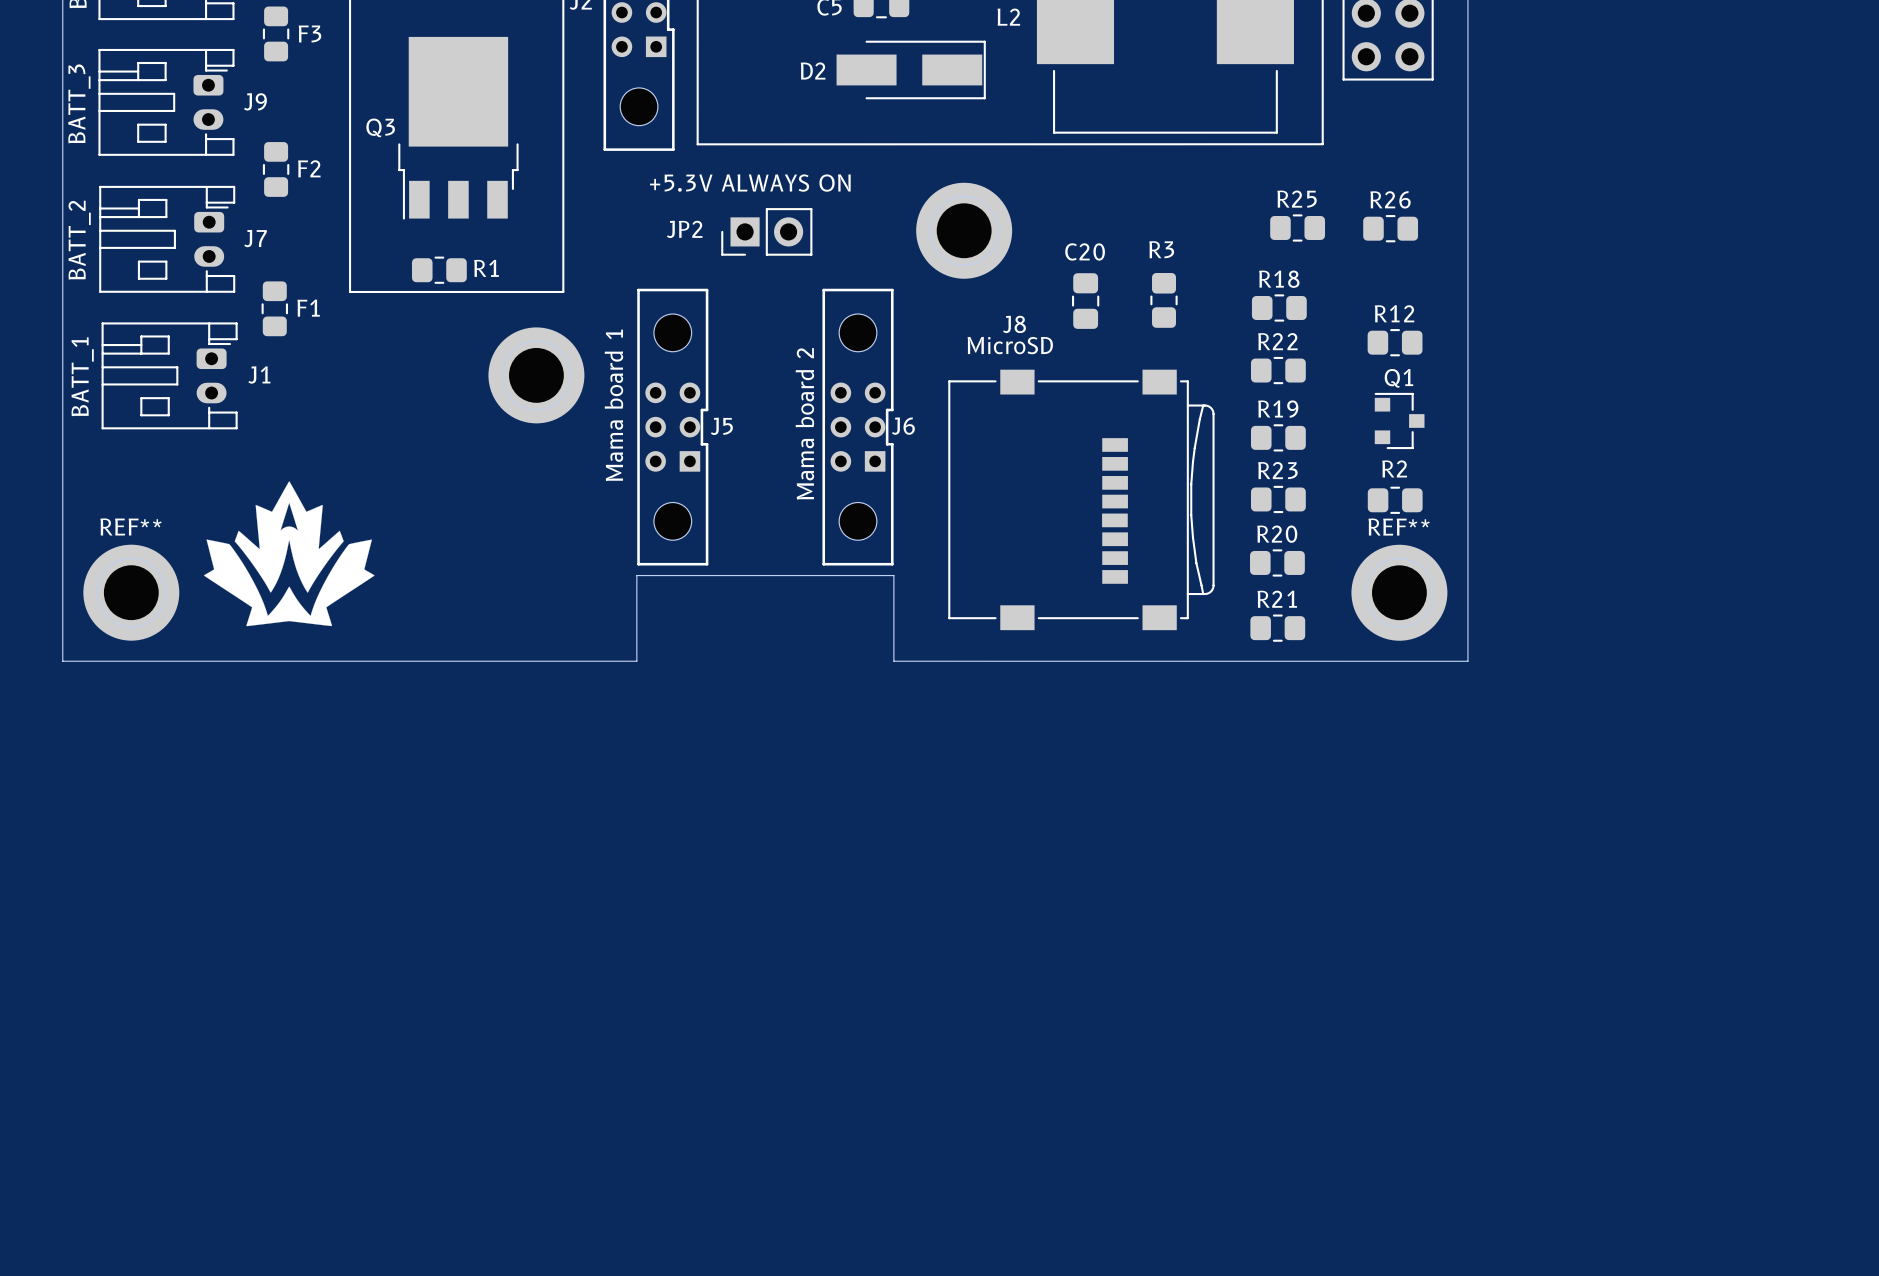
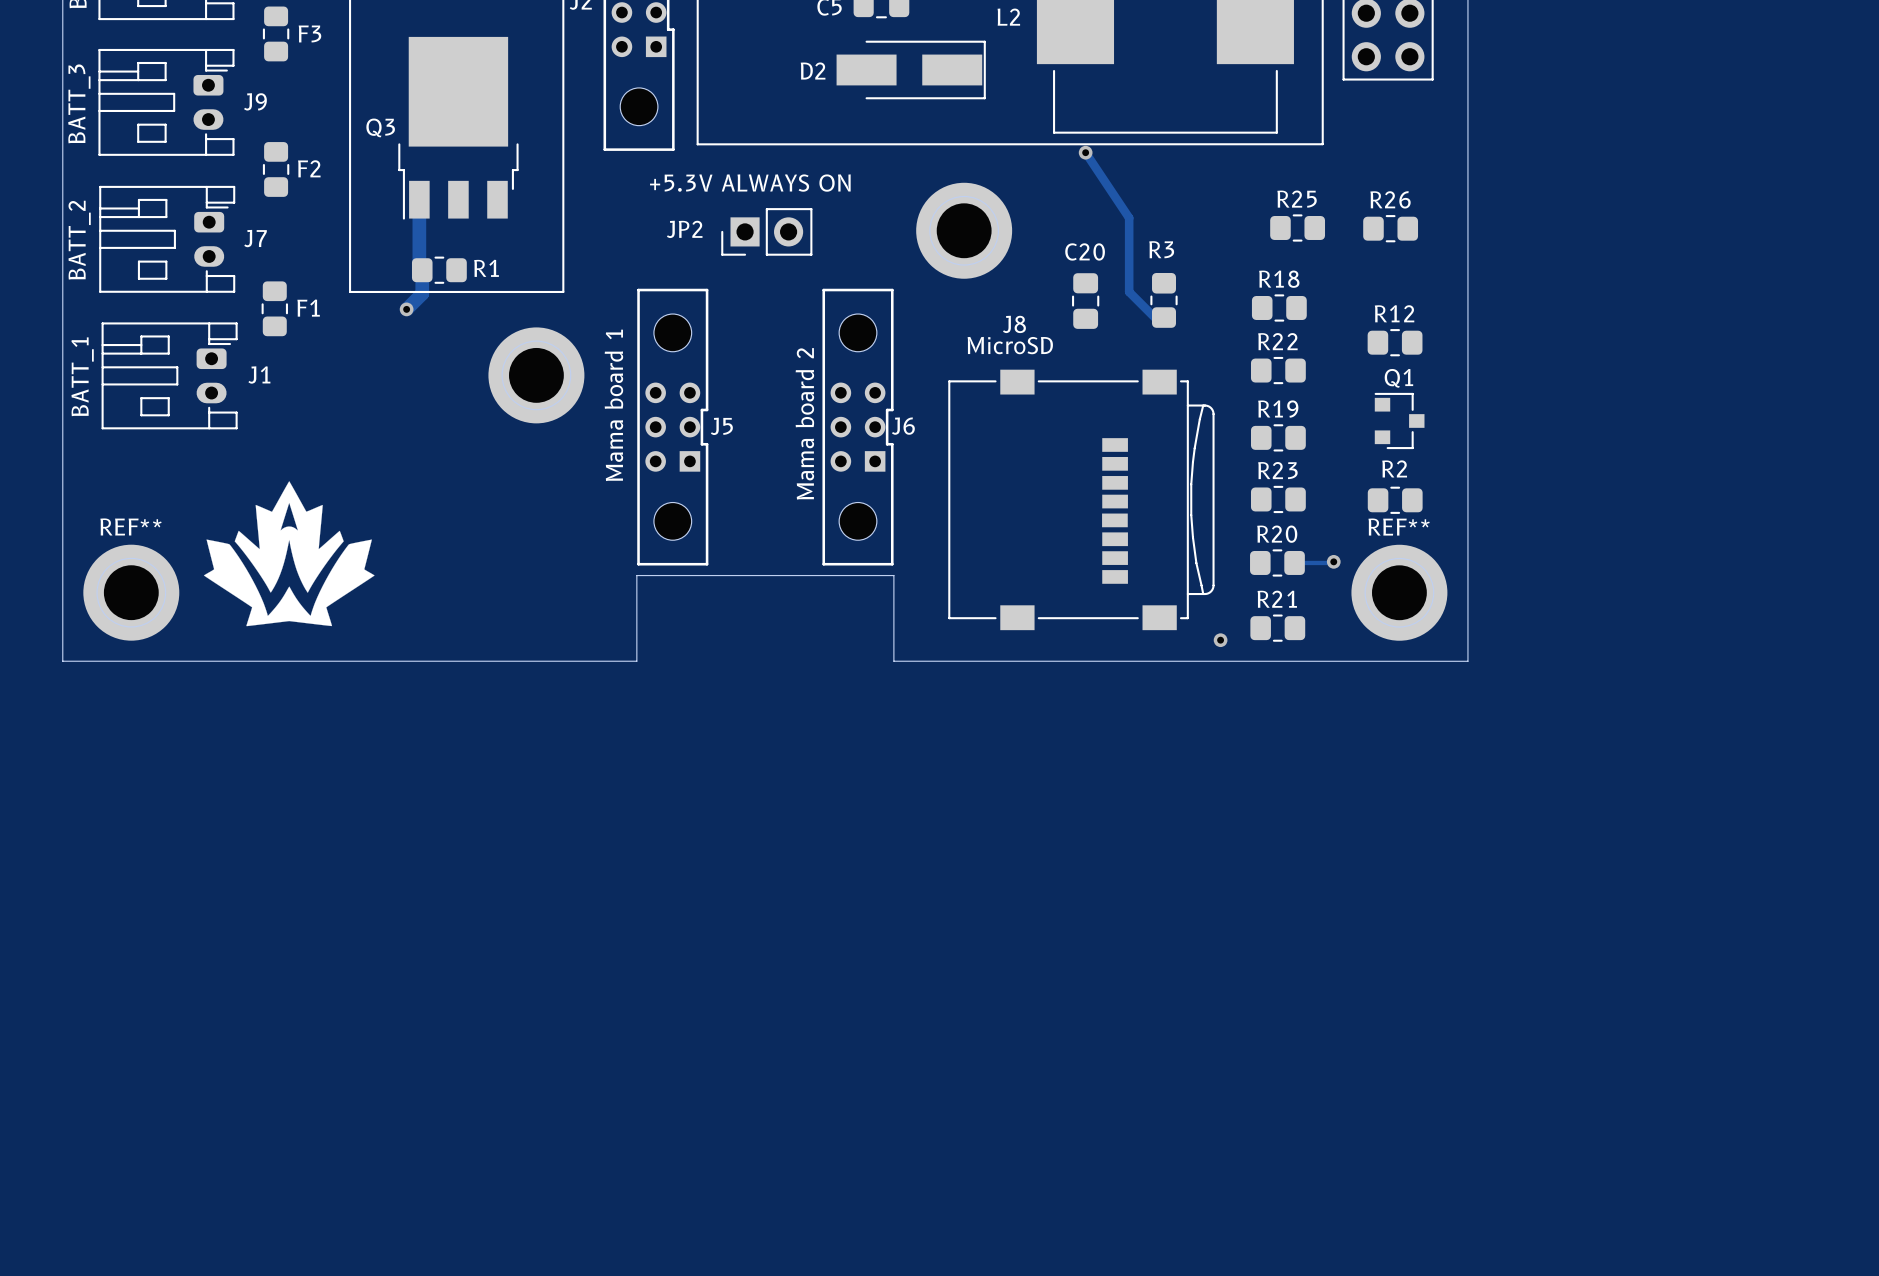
track: none -> (1085, 152) (1129, 217) (1129, 291) (1154, 317) (1163, 318)
via: none -> (1085, 152)
track: none -> (416, 199) (419, 199) (419, 267) (422, 270) (422, 293) (406, 309)
via: none -> (406, 309)
track: none -> (1333, 561) (1294, 562)
via: none -> (1333, 561)
via: none -> (1220, 640)

